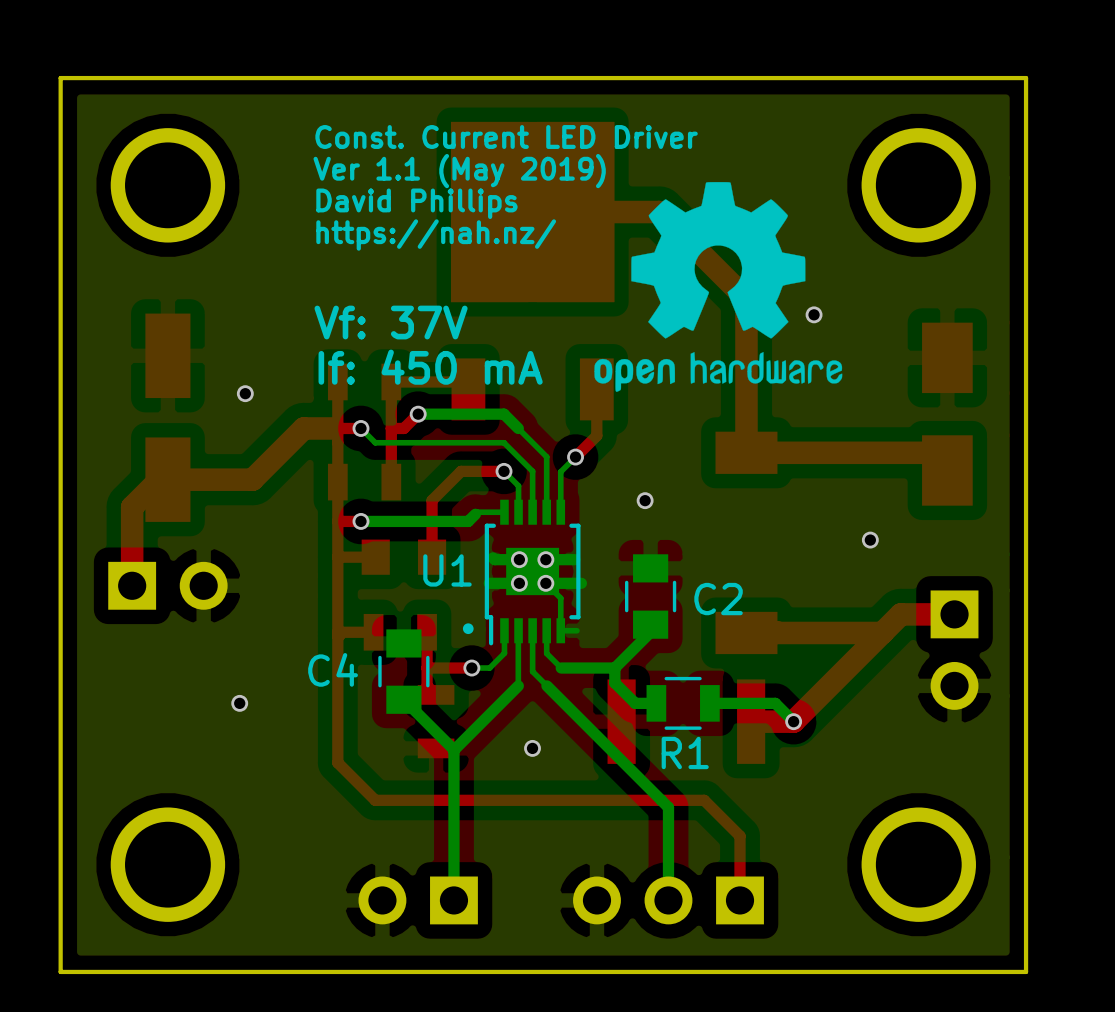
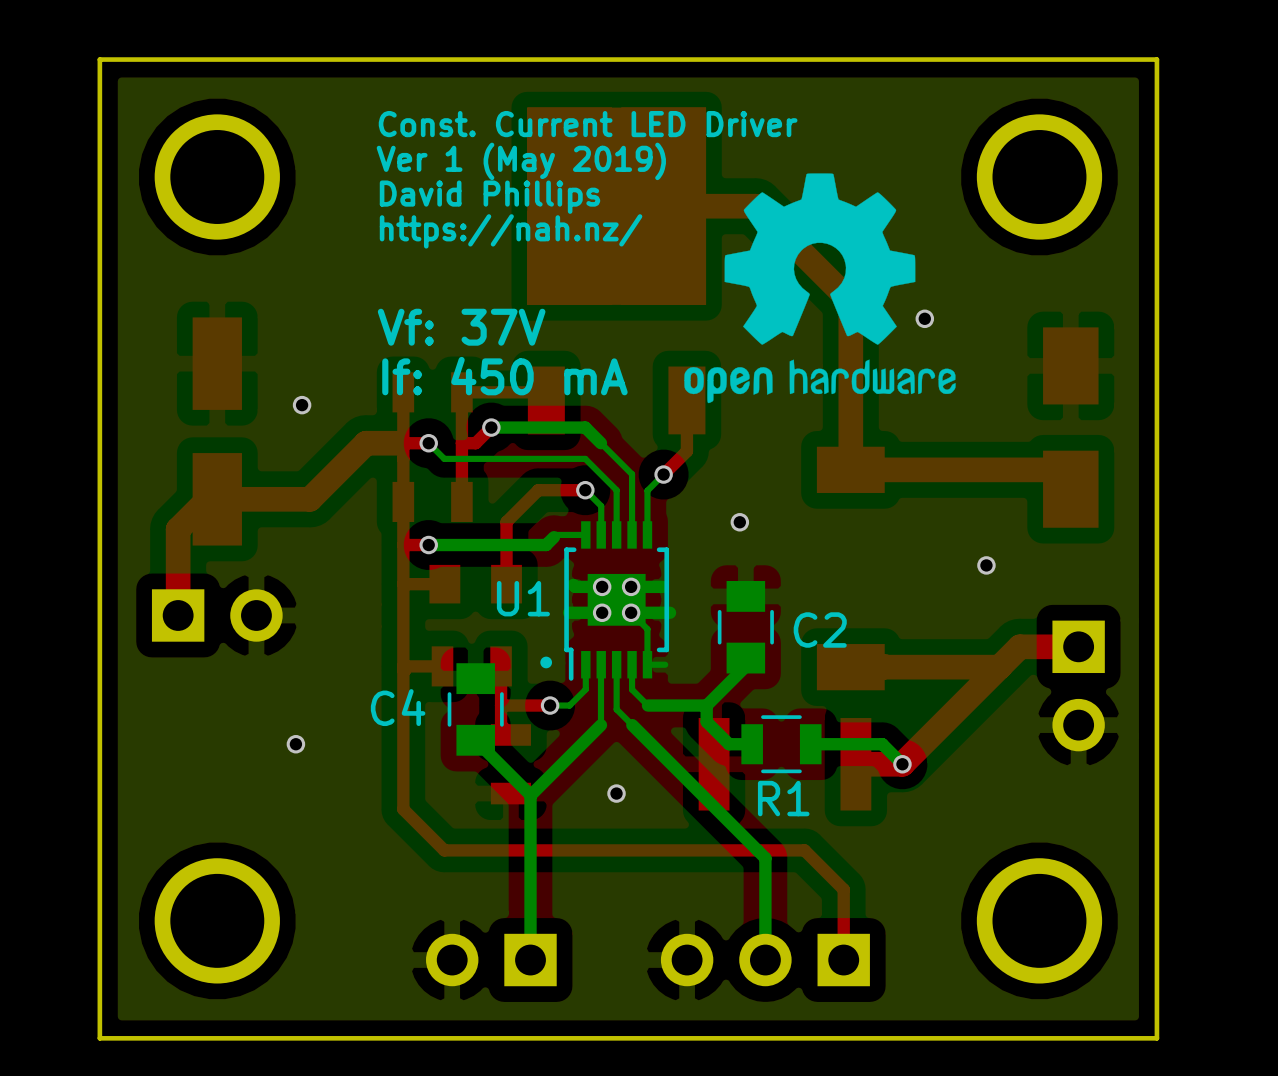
text: Ver 1.1 (May 2019) (459, 171) -> Ver 1 (May 2019) (521, 161)

